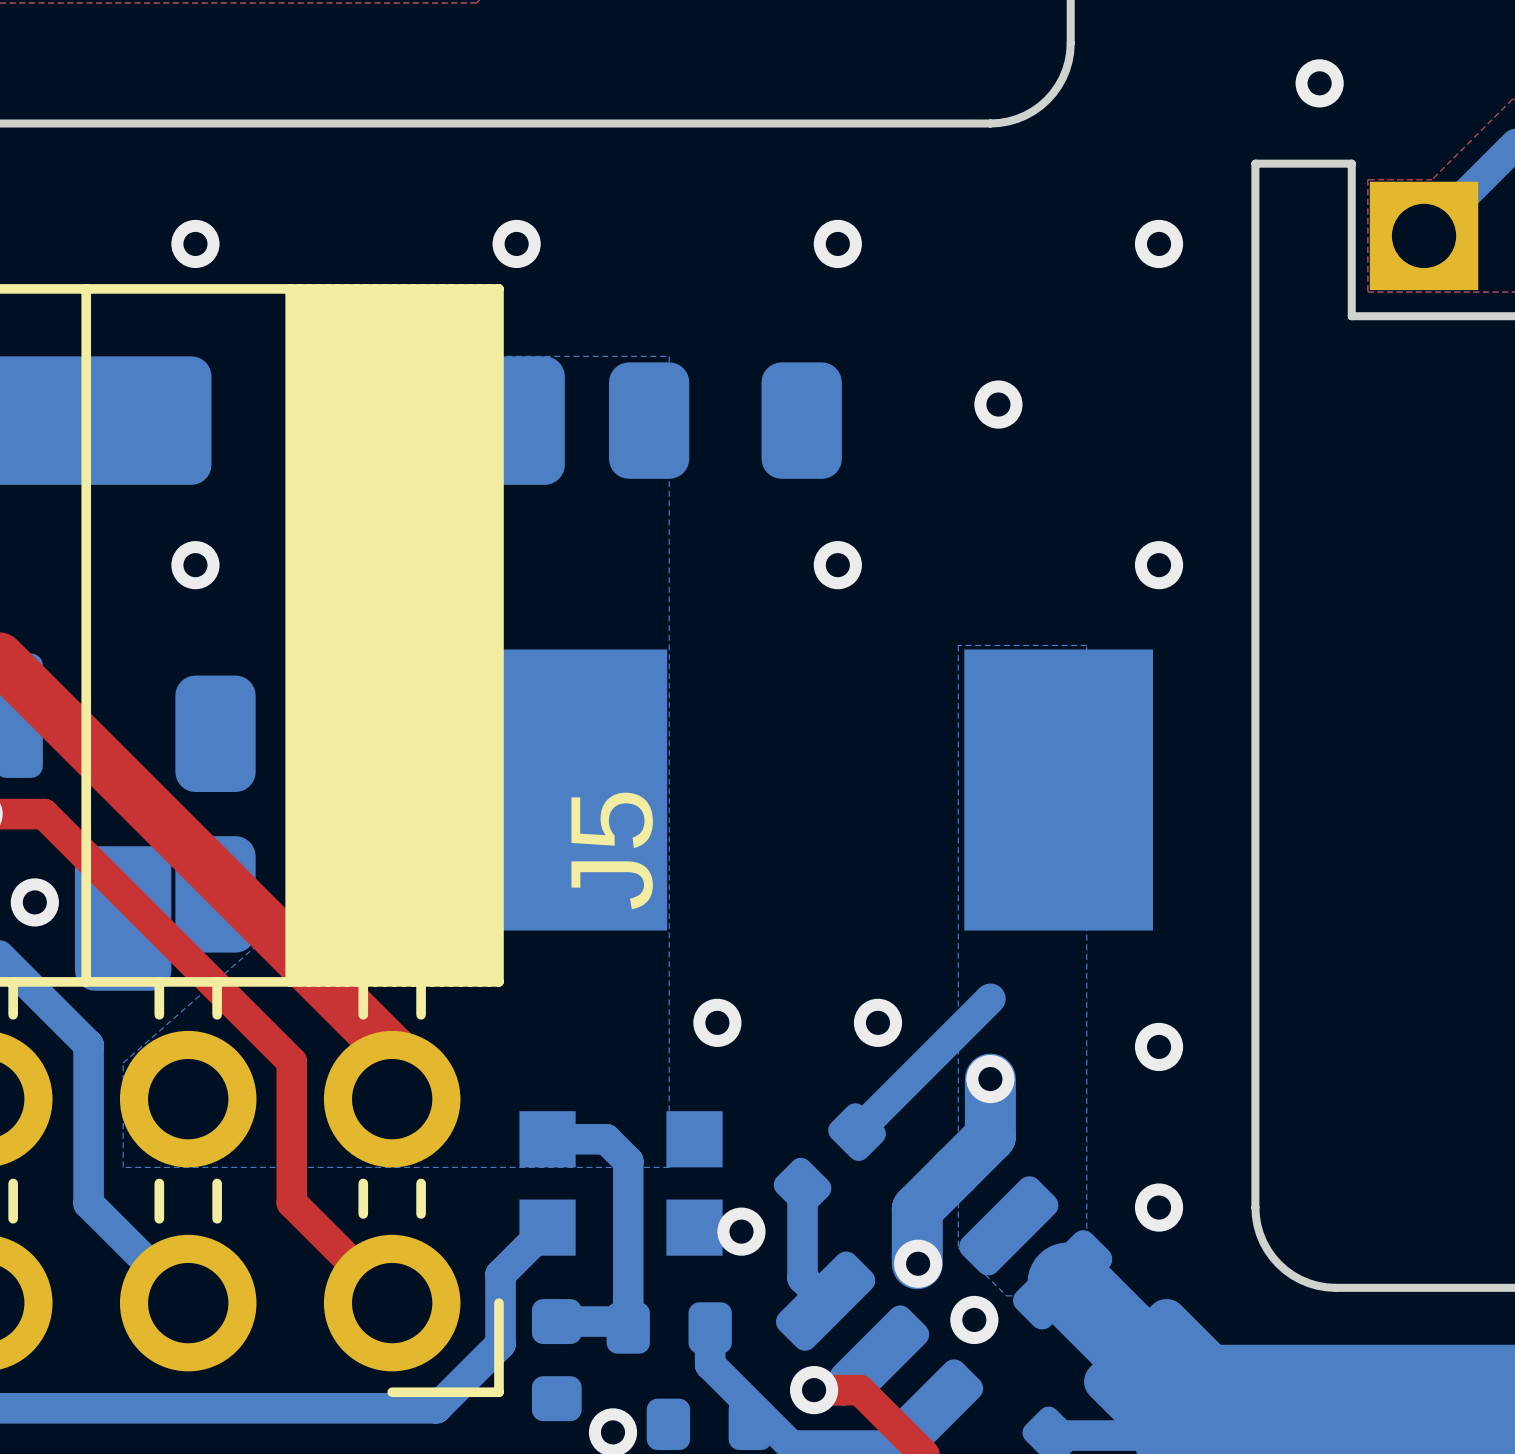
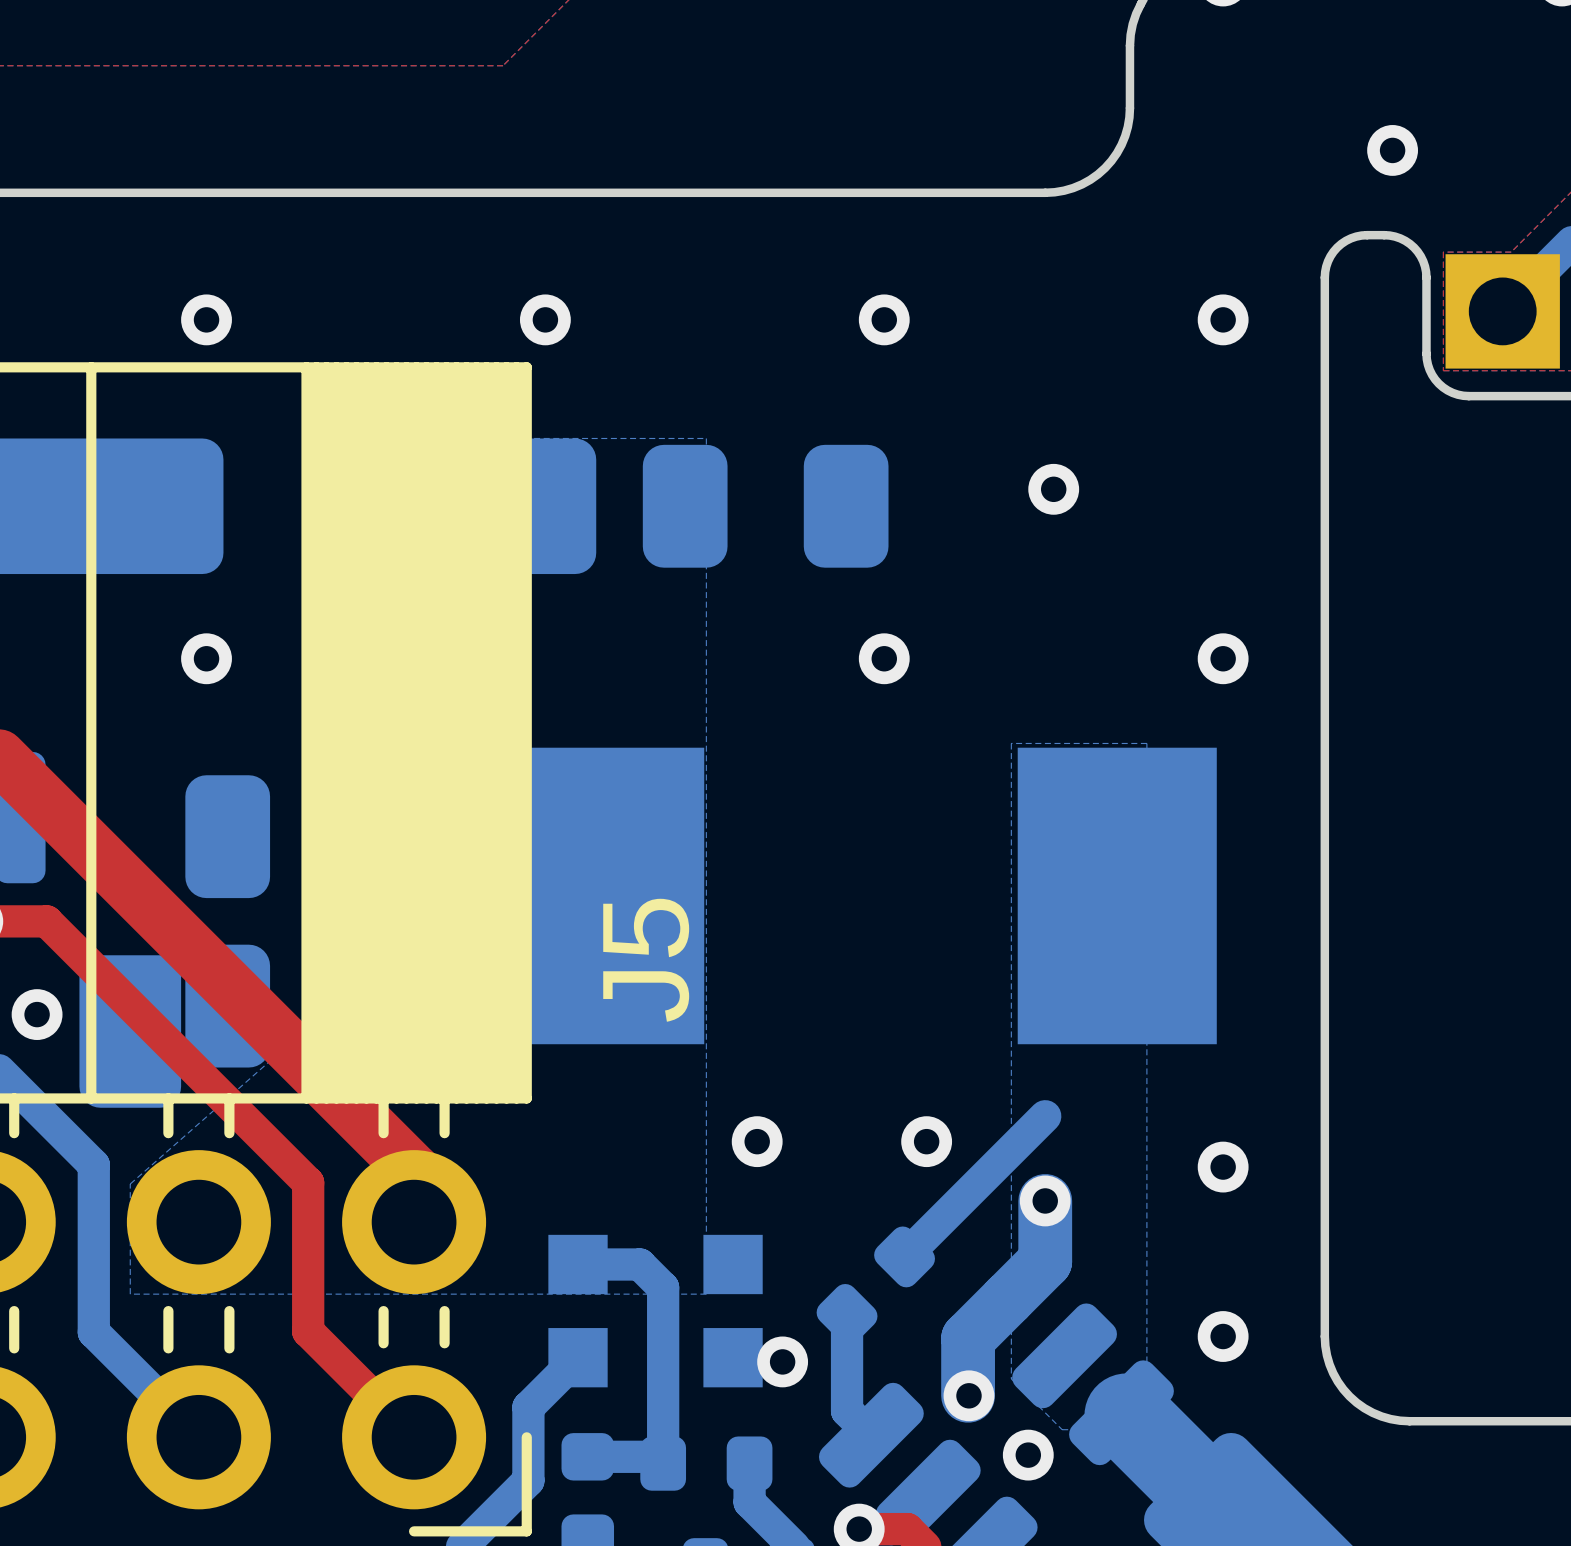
board edge: (1295, 163) (1255, 163) (1255, 203) -> (1367, 235) (1350, 238) (1337, 247) (1328, 261) (1324, 277)
board edge: (1311, 163) (1351, 163) (1351, 203) -> (1384, 235) (1400, 238) (1414, 247) (1423, 261) (1426, 277)
board edge: (1351, 276) (1351, 316) (1391, 316) -> (1426, 353) (1429, 369) (1438, 383) (1452, 392) (1468, 396)

